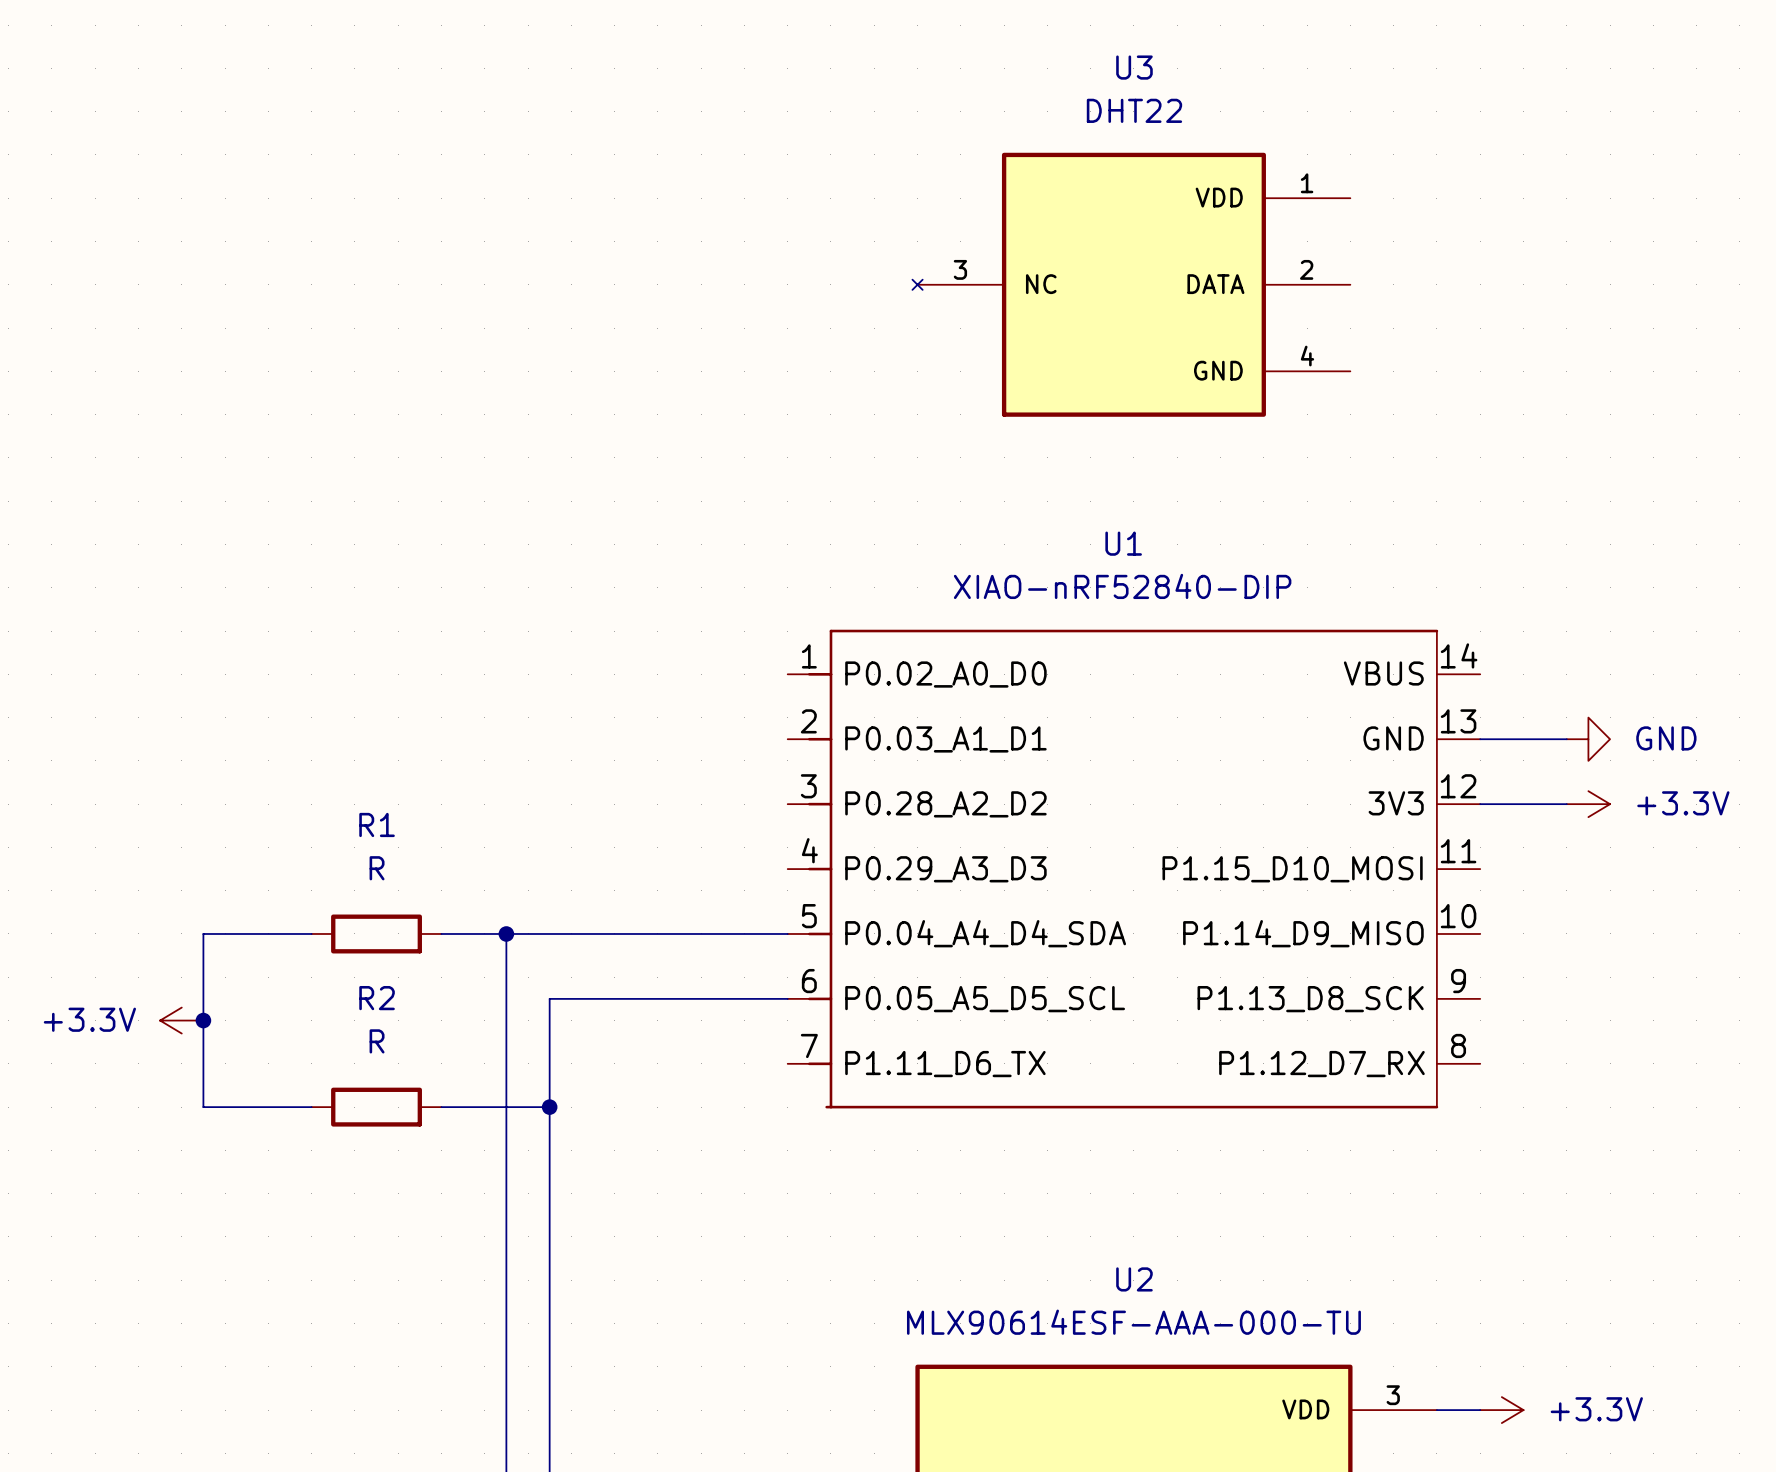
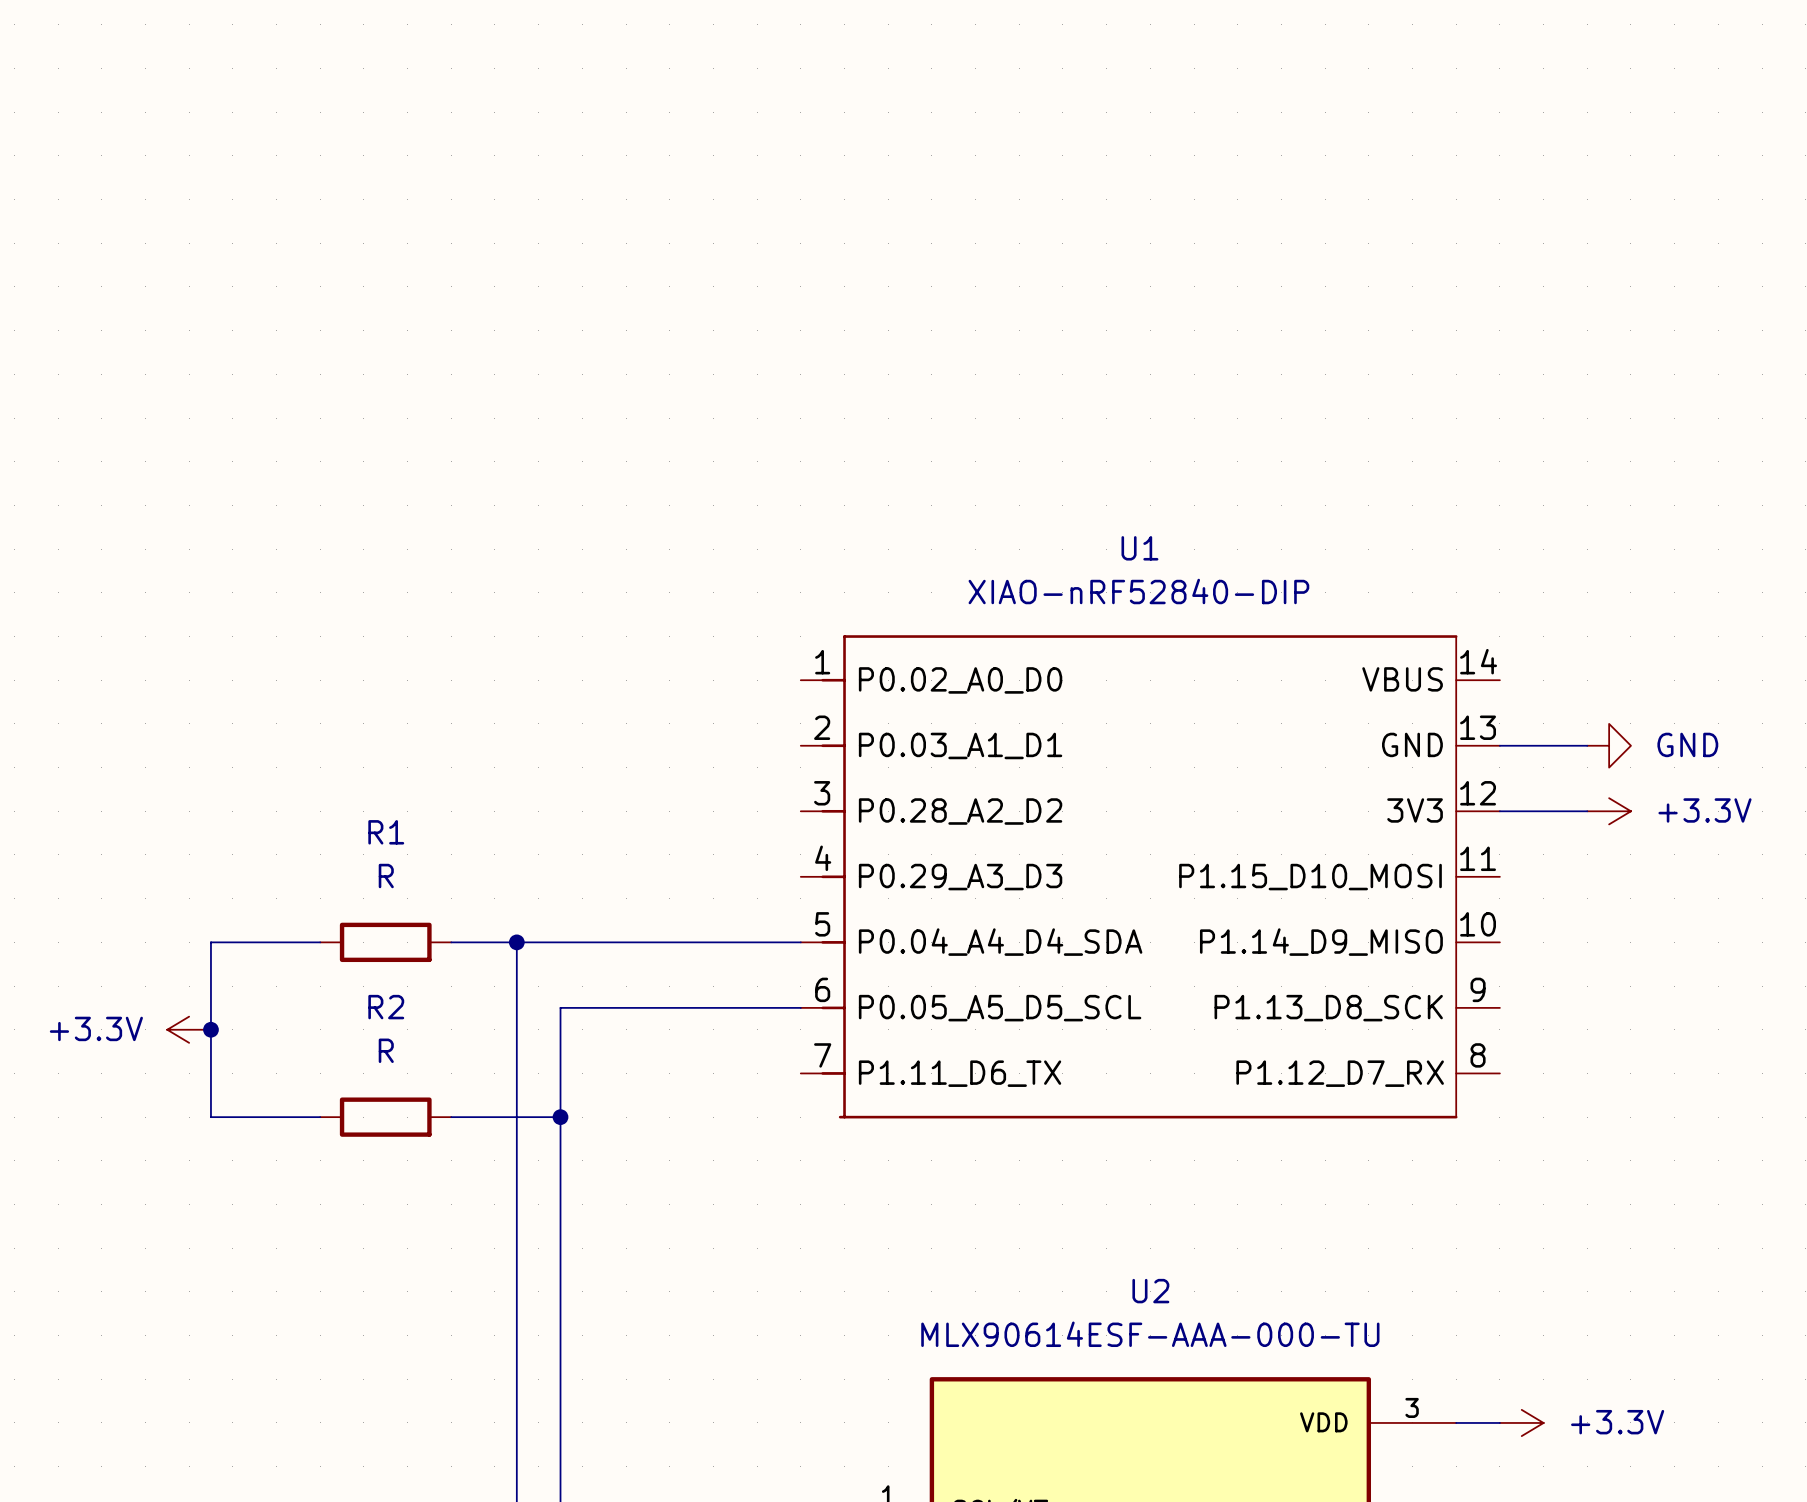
U3: DHT22 (1131, 284) -> none

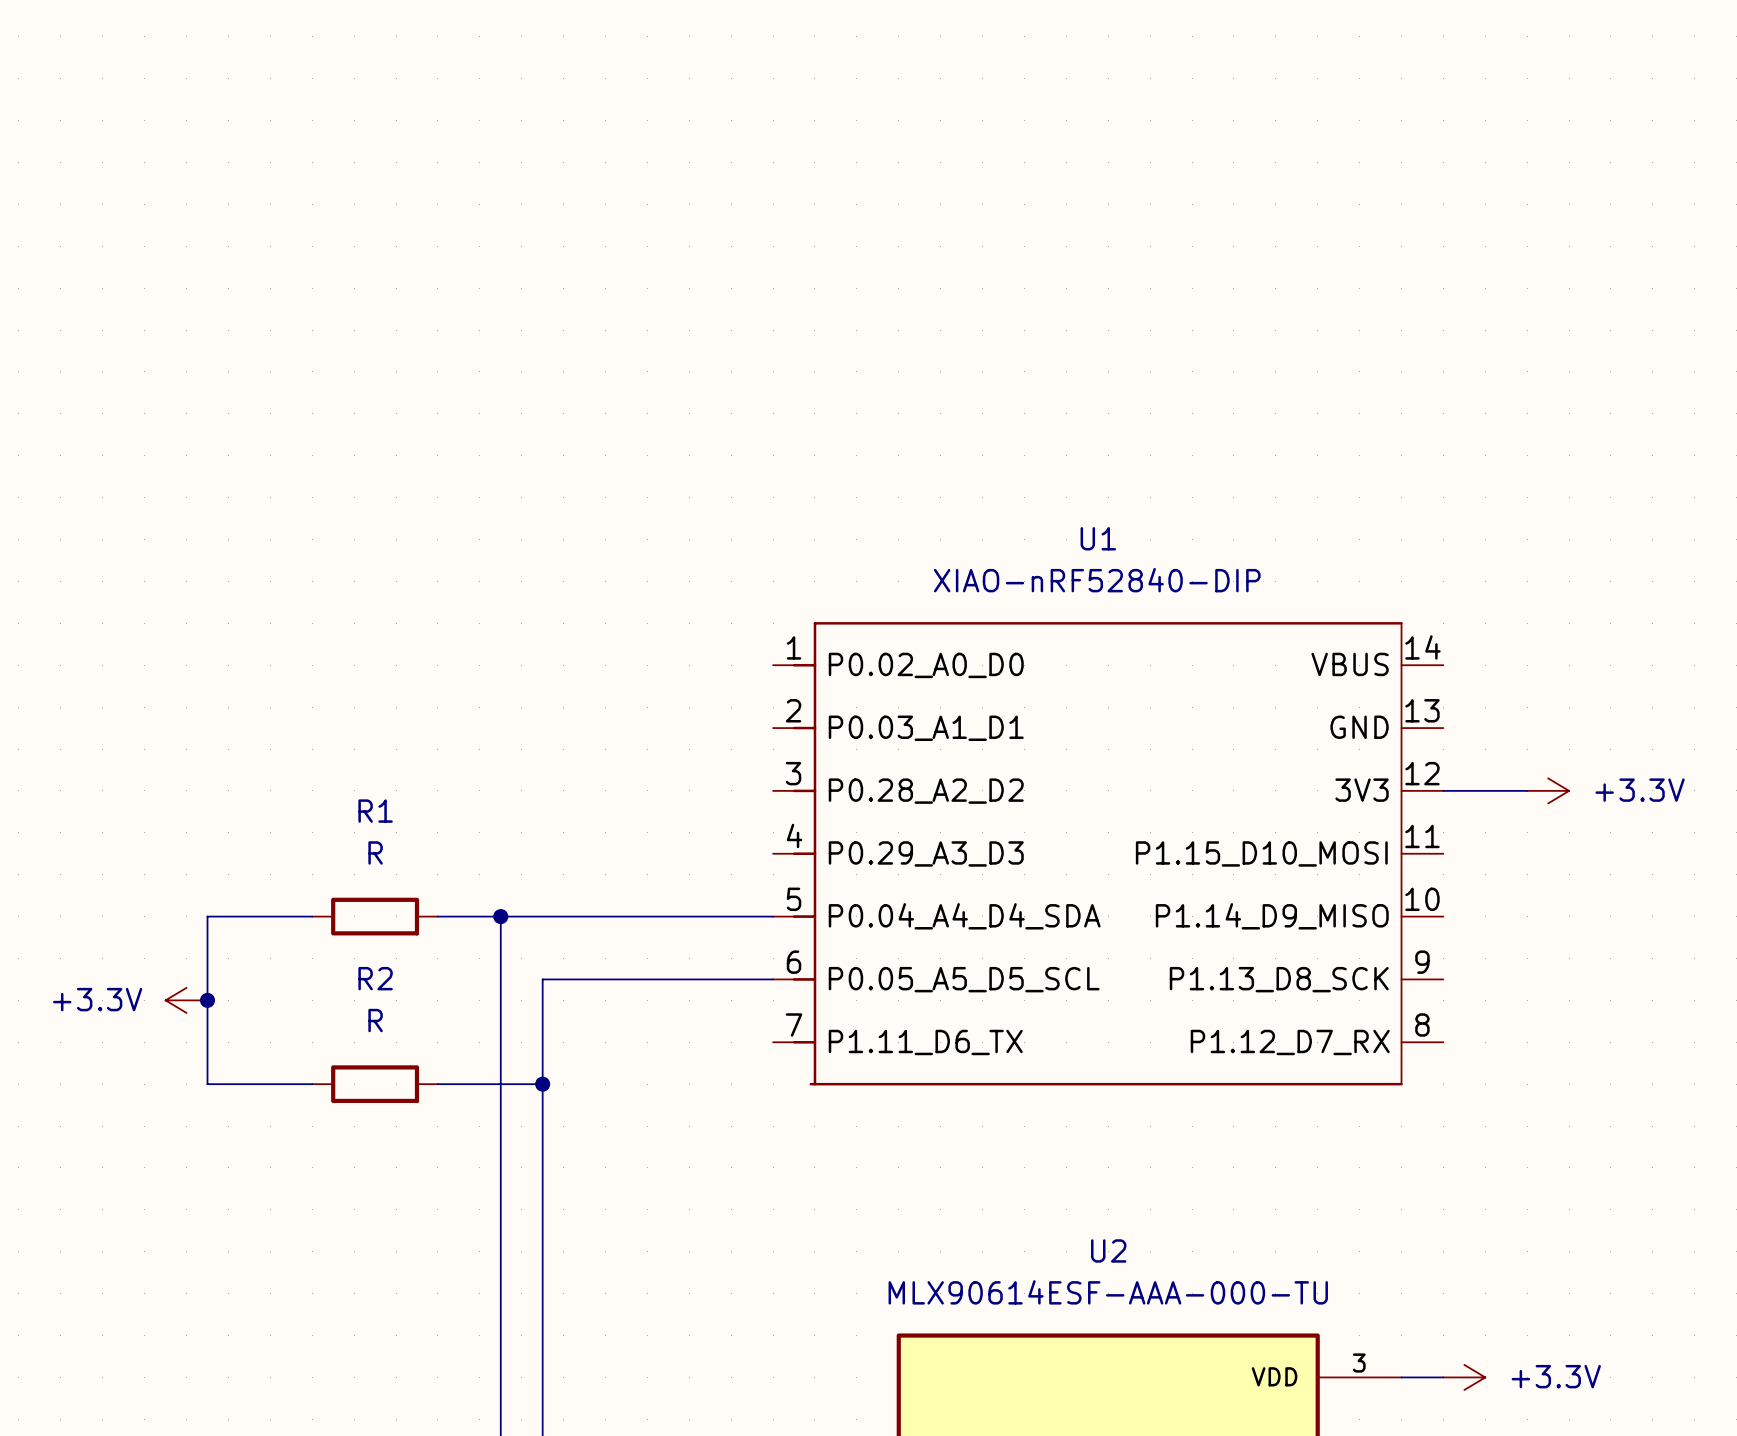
wire: (1499, 745) (1587, 745) -> none
power symbol: GND (1609, 745) -> none

